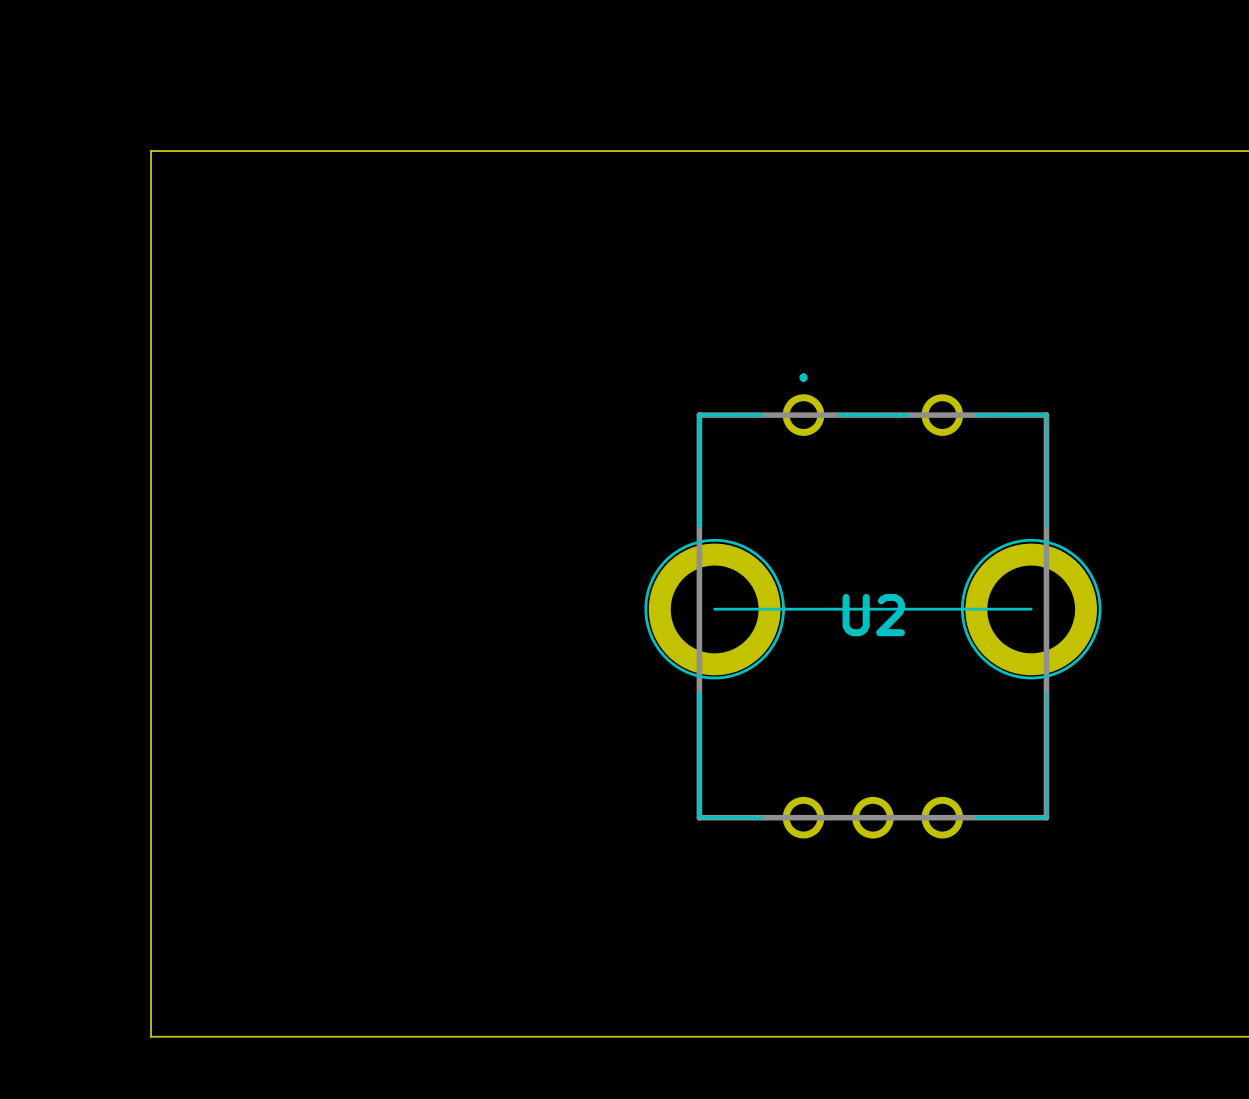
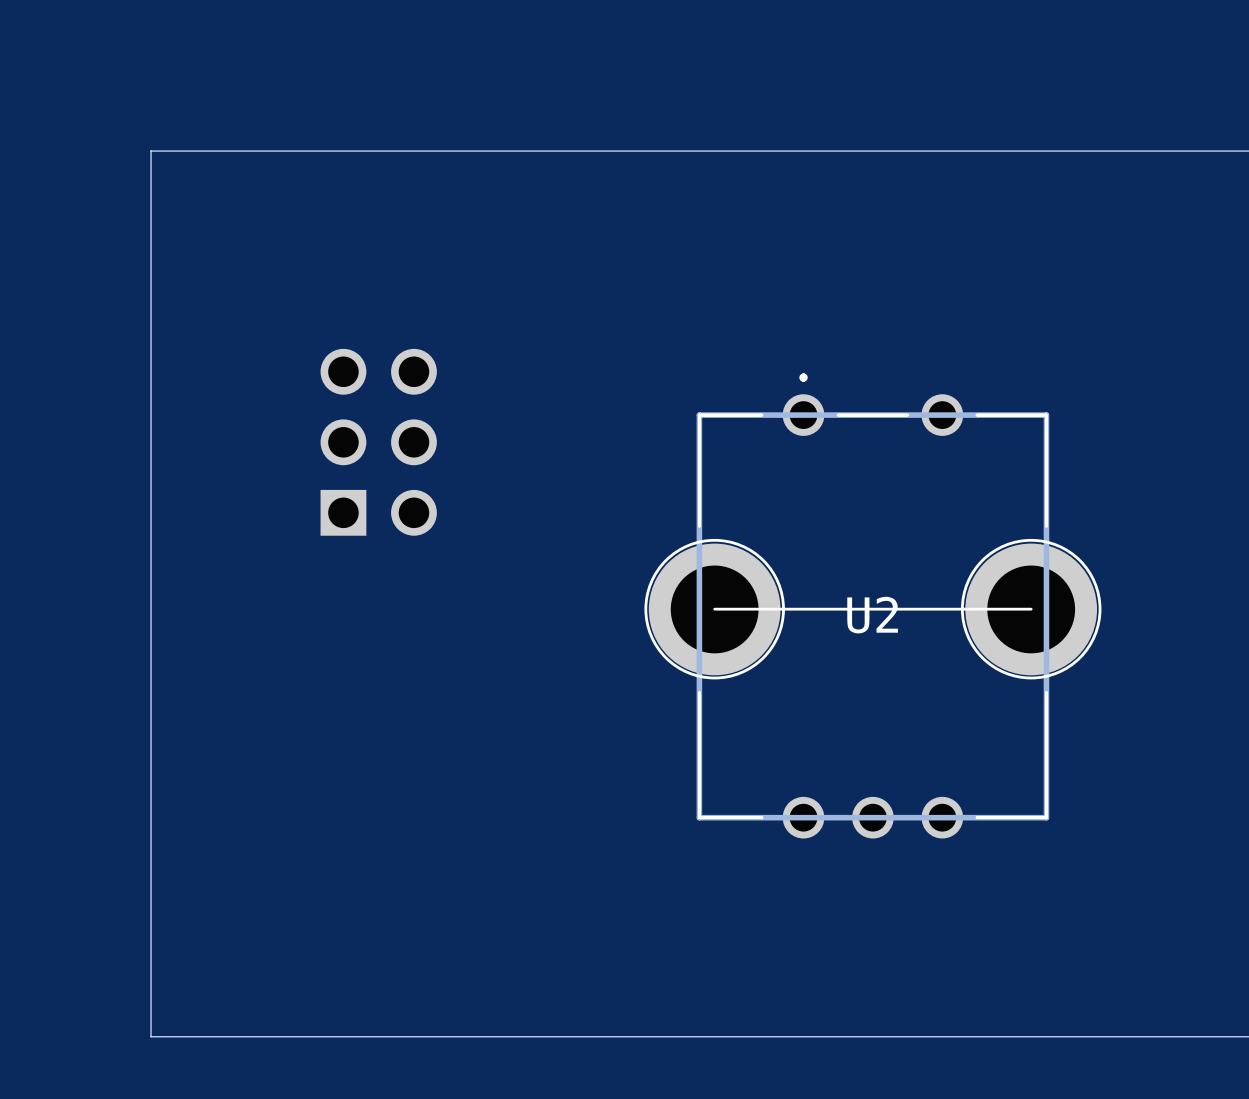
part: none -> (378, 442)

